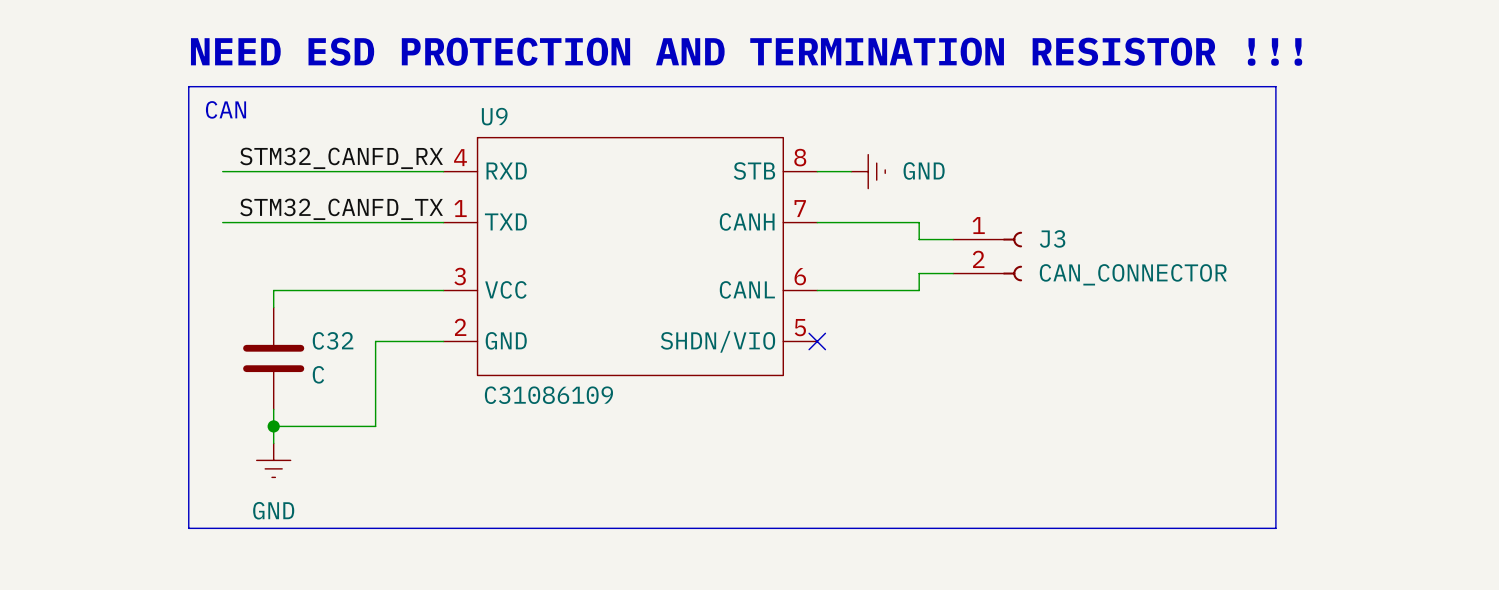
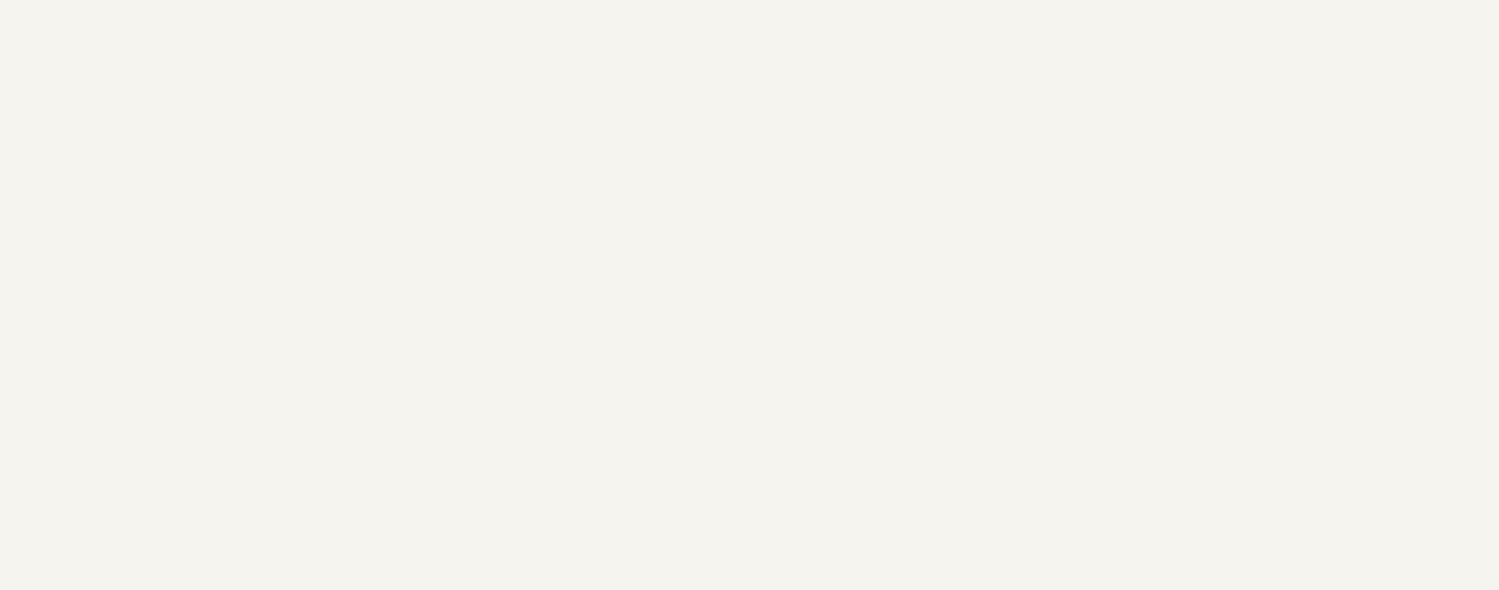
text: NEED ESD PROTECTION AND TERMINATION RESISTOR !!! (746, 51) -> none
line: (188, 86) (1275, 86) (1275, 528) (188, 528) (188, 86) -> none
text: CAN (226, 109) -> none
label: STM32_CANFD_RX (341, 158) -> none
wire: (222, 171) (443, 171) -> none
wire: (817, 171) (851, 171) -> none
power symbol: GND (868, 171) -> none
label: STM32_CANFD_TX (341, 209) -> none
wire: (222, 222) (443, 222) -> none
wire: (817, 222) (919, 222) (919, 239) (953, 239) -> none
U9: C31086109 (630, 256) -> none
J3: CAN_CONNECTOR (987, 256) -> none
wire: (953, 273) (919, 273) (919, 290) (817, 290) -> none
wire: (443, 290) (273, 290) (273, 307) -> none
wire: (443, 341) (375, 341) (375, 426) (273, 426) -> none
no-connect mark: (817, 341) -> none
C32: C (273, 358) -> none
wire: (273, 409) (273, 443) -> none
junction: (273, 426) -> none
power symbol: GND (273, 460) -> none

